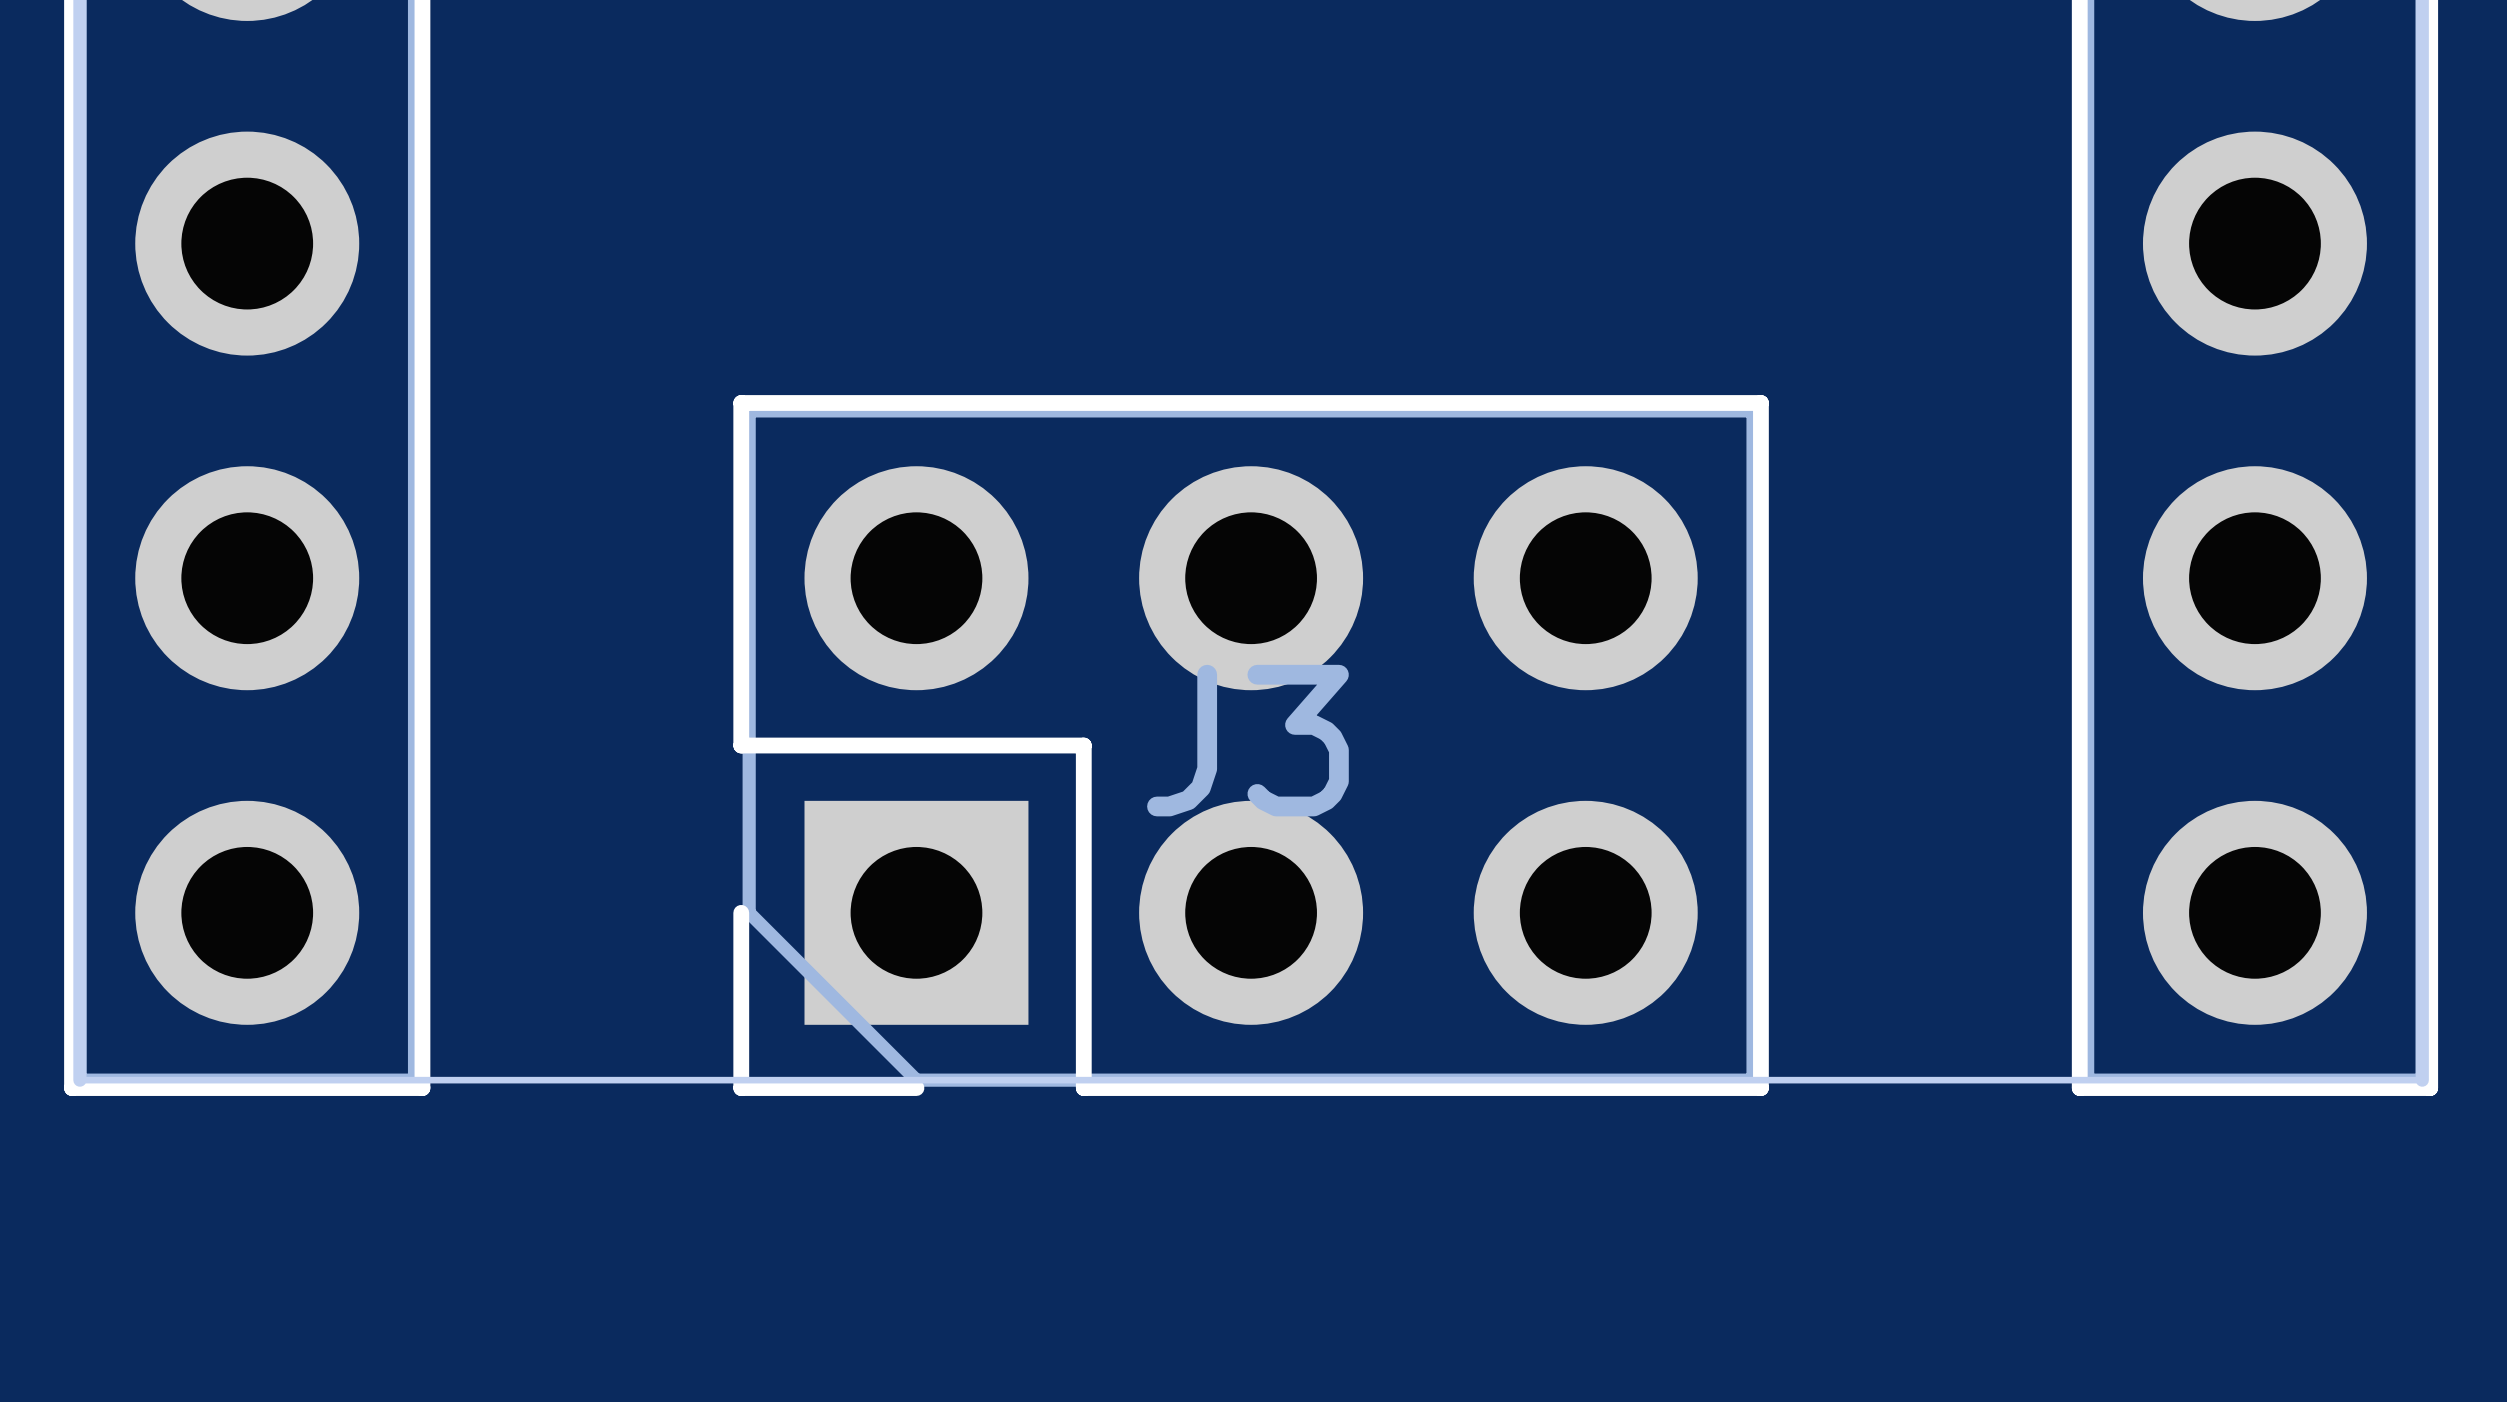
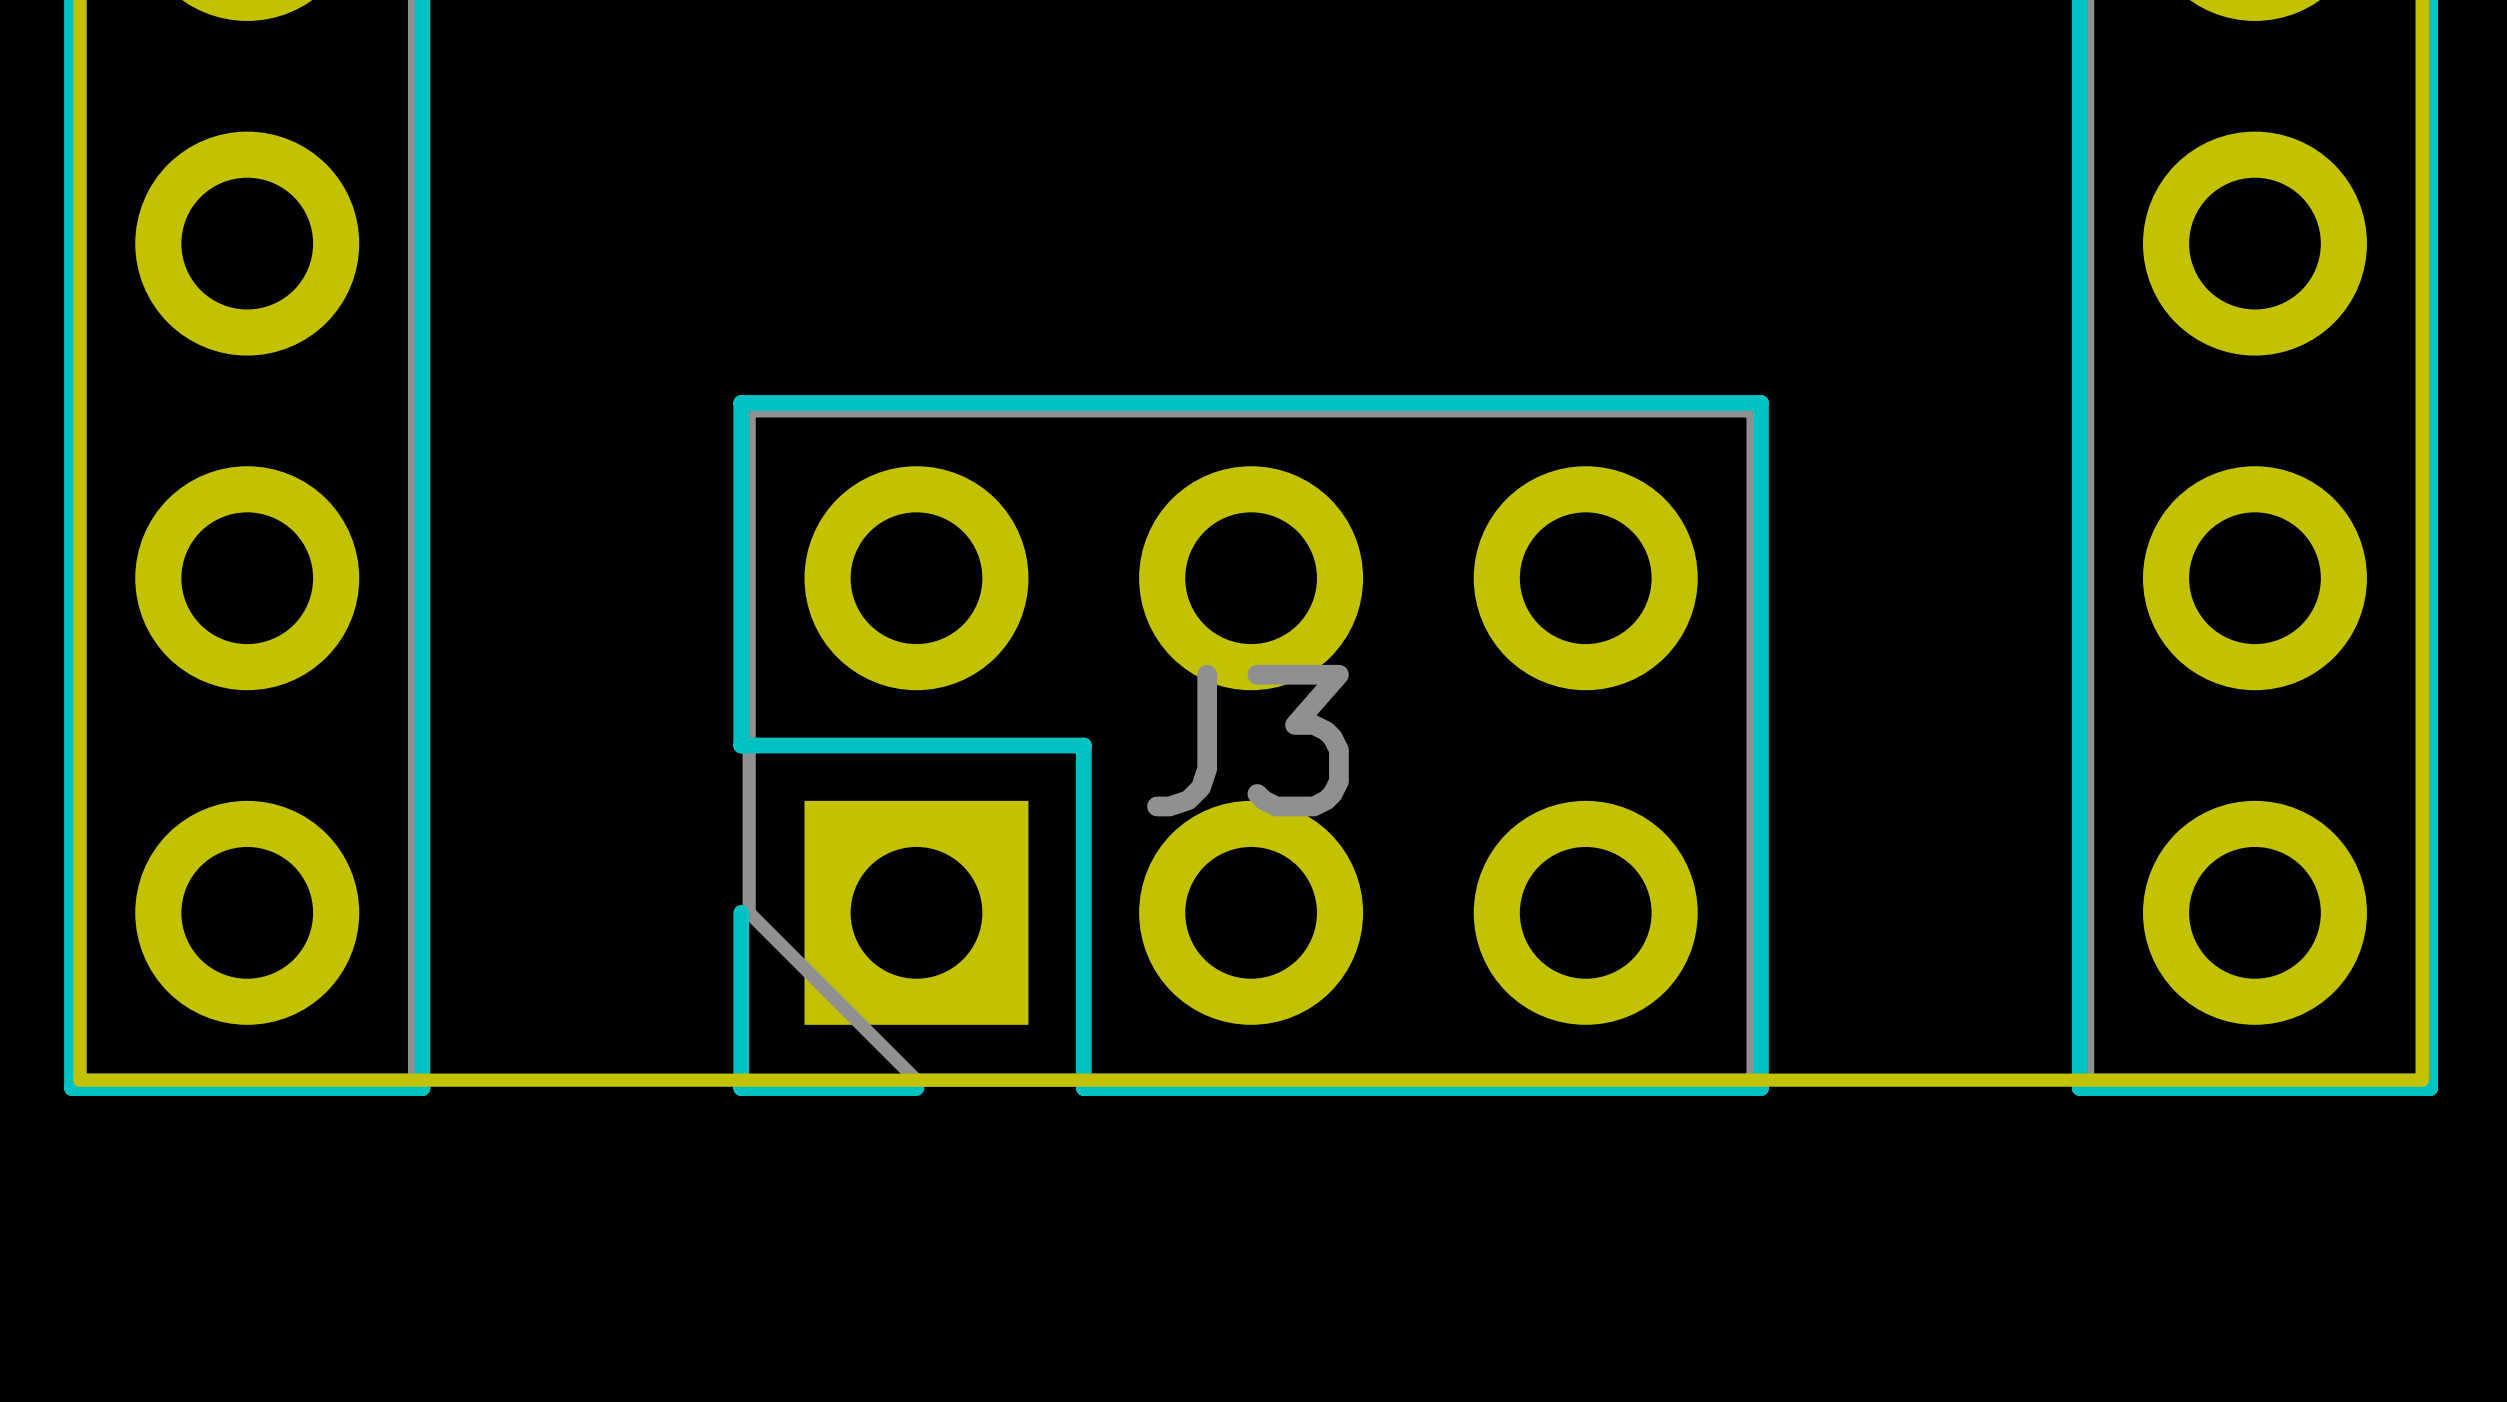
board edge width: thin (79, 1080) (2422, 1080) -> thick (79, 1080) (2422, 1080)

